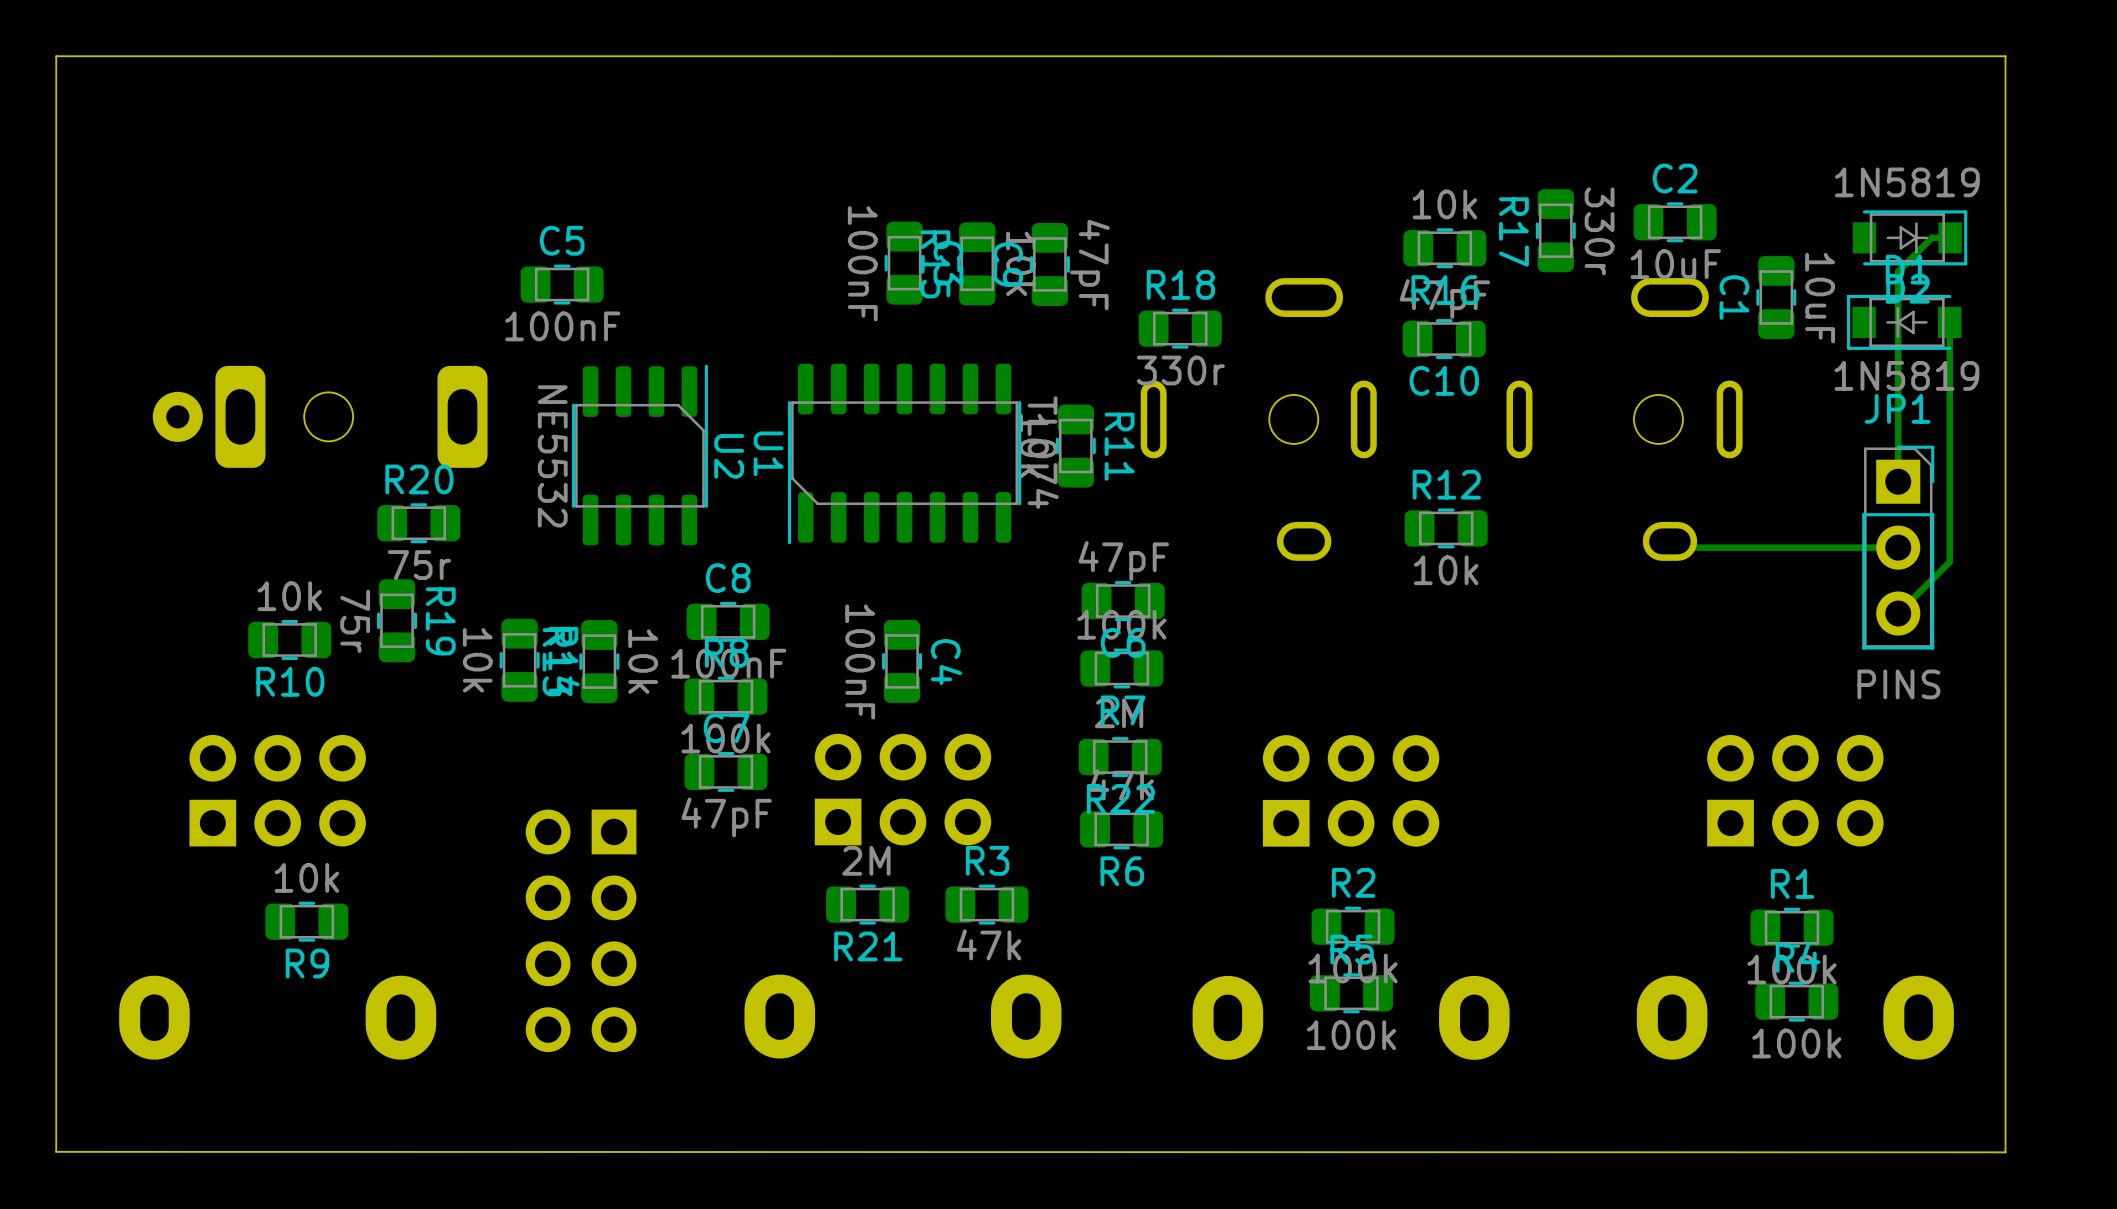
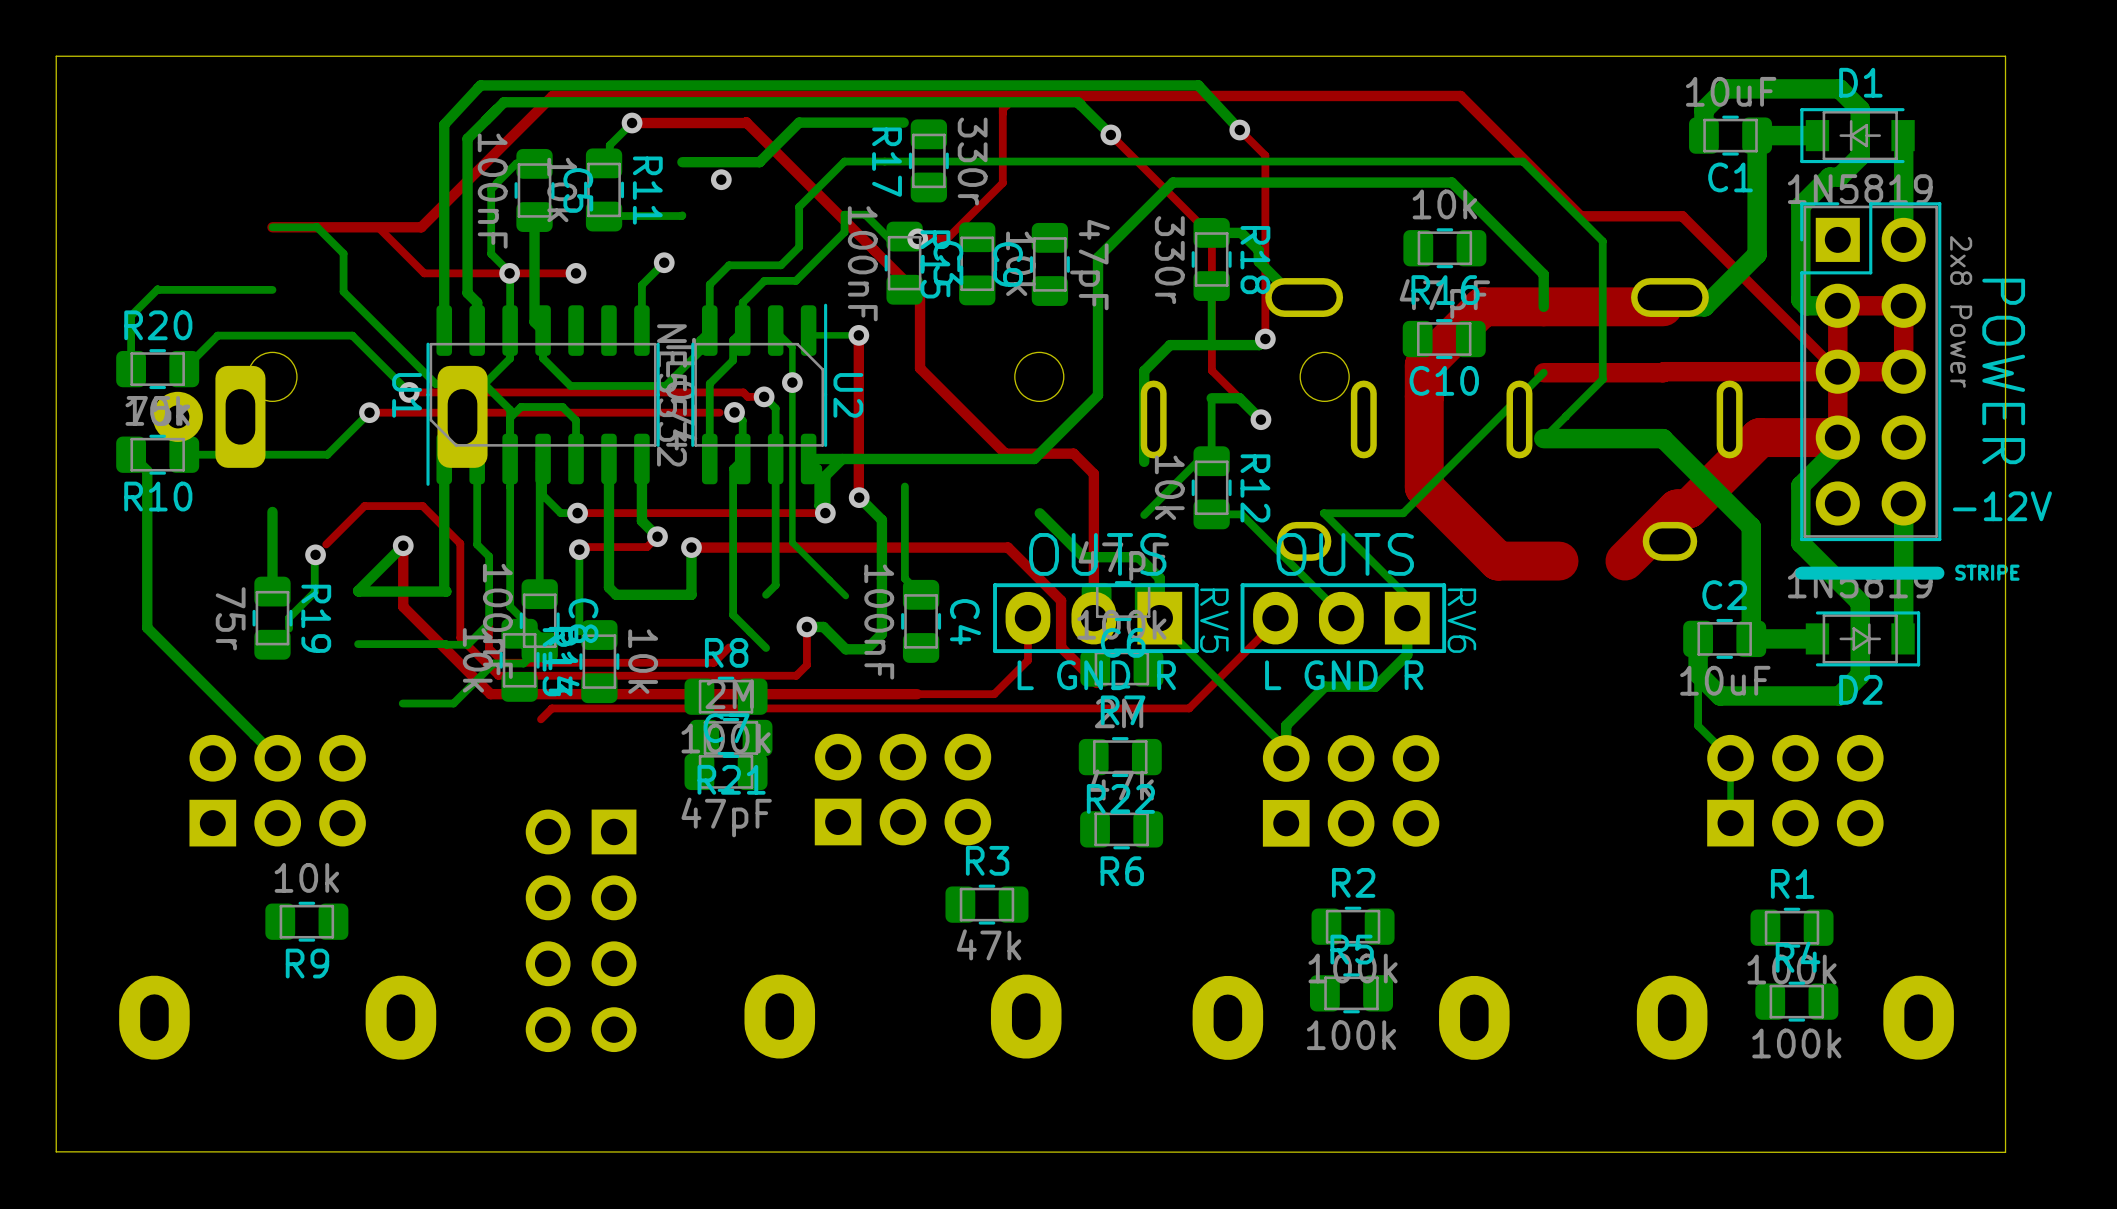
top track: none -> (1006, 95) (1002, 99) (1002, 183) (947, 238) (917, 238)
bottom track: none -> (903, 122) (799, 122) (759, 162) (682, 162)
bottom track: none -> (632, 123) (609, 145) (609, 162)
top track: none -> (632, 123) (746, 122) (920, 296) (920, 368) (1005, 453) (1073, 453) (1093, 473) (1093, 618)
via: none -> (632, 123)
bottom track: none -> (1239, 130) (1198, 85) (480, 85) (444, 124) (444, 330)
top track: none -> (1239, 130) (1265, 155) (1265, 339)
via: none -> (1239, 130)
bottom track: none -> (1110, 134) (1077, 102) (504, 102) (467, 138) (467, 293) (477, 302) (477, 330)
top track: none -> (1110, 134) (1211, 236) (1211, 370) (1260, 419)
via: none -> (1110, 134)
bottom track: none -> (1703, 135) (1703, 110) (1725, 88) (1839, 88) (1860, 109) (1860, 156) (1839, 177) (1829, 177) (1800, 205) (1800, 300) (1806, 305) (1837, 305)
bottom track: none -> (1817, 135) (1757, 135) (1757, 254) (1704, 306) (1663, 306)
bottom track: none -> (1903, 135) (1903, 239)
bottom track: none -> (537, 163) (516, 163) (491, 189) (491, 253) (510, 272) (510, 358) (484, 384)
via: none -> (721, 179)
bottom track: none -> (682, 215) (609, 216)
bottom track: none -> (534, 217) (534, 322) (543, 330) (543, 358) (570, 385) (665, 385) (700, 351) (700, 340) (709, 330) (709, 284) (729, 265) (780, 265) (799, 247) (799, 206) (844, 161) (1522, 161) (1602, 241) (1602, 379) (1565, 416)
C2 position: (1675, 222) -> (1724, 638)
bottom track: none -> (272, 227) (316, 226) (343, 253) (343, 291) (435, 384) (484, 384)
R17 position: (1555, 230) -> (928, 160)
bottom track: none -> (1211, 232) (1241, 232) (1258, 250) (1258, 261) (1288, 291) (1323, 291)
D2 position: (1910, 237) -> (1862, 638)
bottom track: (1950, 237) (1931, 237) (1898, 271) (1898, 481) -> none
bottom track: none -> (917, 238) (889, 238) (865, 214) (844, 214) (844, 232) (795, 280) (764, 280) (742, 302) (742, 330) (733, 340) (733, 360) (709, 383) (709, 458)
via: none -> (917, 238)
bottom track: none -> (664, 262) (641, 285) (641, 330)
via: none -> (664, 262)
via: none -> (509, 273)
top track: none -> (576, 273) (424, 273) (378, 227) (272, 227) (421, 227) (552, 95) (1460, 95) (1580, 216) (1682, 216) (1837, 371)
via: none -> (576, 273)
C5 rotation: 0° (562, 284) -> 90° clockwise (534, 190)
C5 position: (562, 284) -> (534, 190)
bottom track: none -> (1211, 286) (1211, 345)
bottom track: none -> (272, 289) (157, 289) (131, 315) (131, 369)
C1 name position: C1 (1734, 297) -> C1 (1730, 177)
C1 rotation: 0° (1776, 297) -> 90° clockwise (1730, 135)
C1 position: (1776, 297) -> (1730, 135)
C1 value position: 10uF (1820, 298) -> 10uF (1731, 91)
bottom track: none -> (1543, 306) (1543, 274) (1451, 182) (1173, 182) (1098, 257) (1098, 395) (1034, 458) (808, 458) (818, 468) (818, 505) (825, 513) (825, 475) (842, 458)
top track: none -> (1663, 306) (1482, 306) (1424, 365) (1424, 487) (1498, 561) (1559, 561)
D1 position: (1904, 322) -> (1857, 135)
bottom track: (1949, 322) (1949, 562) (1898, 613) -> none
R18 rotation: 0° (1180, 328) -> 90° clockwise (1211, 259)
R18 position: (1180, 328) -> (1211, 259)
bottom track: none -> (775, 330) (792, 347) (792, 542) (845, 596)
bottom track: none -> (808, 330) (813, 335) (858, 335)
top track: none -> (858, 335) (859, 497)
via: none -> (858, 335)
bottom track: none -> (1265, 339) (1259, 345) (1170, 345) (1144, 371) (1144, 461)
via: none -> (1265, 339)
round board edge: none -> [1014, 351, 1065, 403]
bottom track: none -> (184, 369) (217, 335) (352, 335) (409, 392)
bottom track: none -> (1543, 372) (1403, 513) (1323, 513) (1407, 596) (1407, 654) (1375, 686) (1324, 686) (1286, 725) (1286, 758)
top track: none -> (1543, 372) (1664, 371) (1903, 371) (1903, 305) (1837, 305) (1837, 437) (1759, 437) (1688, 508) (1677, 508) (1624, 561)
via: none -> (792, 382)
bottom track: none -> (484, 384) (510, 409) (510, 606) (539, 636) (539, 647) (523, 663) (493, 663) (453, 703) (402, 703)
part: none -> 2x8 Power (1869, 390)
top track: none -> (409, 392) (743, 392) (747, 396) (764, 396)
via: none -> (409, 392)
round board edge: [1633, 394, 1684, 445] -> none
bottom track: none -> (764, 396) (775, 408) (775, 585) (766, 594)
via: none -> (764, 396)
bottom track: none -> (369, 412) (327, 454) (184, 454)
via: none -> (369, 412)
top track: none -> (719, 412) (369, 412)
bottom track: none -> (734, 412) (742, 420) (742, 458) (733, 468) (733, 615) (766, 647)
via: none -> (734, 412)
round board edge position: (328, 416) -> (272, 376)
bottom track: none -> (1565, 416) (1543, 438) (1663, 438) (1751, 526) (1751, 638) (1817, 638)
bottom track: none -> (510, 417) (521, 406) (562, 406) (576, 420) (576, 458)
bottom track: none -> (1260, 419) (1239, 398) (1211, 398) (1211, 461) (1198, 461) (1144, 515)
via: none -> (1260, 419)
round board edge position: (1293, 419) -> (1324, 376)
bottom track: none -> (1837, 437) (1837, 448) (1800, 485) (1800, 543) (1860, 602) (1860, 675) (1839, 695) (1720, 695) (1698, 673) (1698, 638) (1698, 725) (1730, 758) (1730, 823)
R11 position: (1075, 446) -> (604, 189)
U1 position: (904, 453) -> (543, 395)
bottom track: none -> (131, 454) (147, 470) (147, 627) (277, 758)
U2 position: (639, 455) -> (759, 394)
bottom track: none -> (444, 458) (444, 589) (446, 591) (358, 591) (403, 545)
bottom track: none -> (477, 458) (477, 544) (489, 556) (489, 623) (467, 644) (358, 644)
bottom track: none -> (608, 458) (608, 587) (616, 594) (691, 594) (691, 547)
bottom track: none -> (641, 458) (641, 521) (657, 536)
bottom track: none -> (904, 486) (904, 578) (921, 594)
via: none -> (859, 497)
bottom track: none -> (860, 498) (881, 520) (881, 633) (866, 649) (845, 649) (823, 626) (806, 626)
bottom track: none -> (1903, 503) (1903, 638)
bottom track: none -> (272, 511) (272, 591)
bottom track: none -> (577, 513) (560, 513) (543, 495) (543, 458) (539, 462) (539, 594)
via: none -> (577, 513)
top track: none -> (825, 513) (577, 513)
via: none -> (825, 513)
bottom track: none -> (1039, 513) (1083, 557) (1138, 557) (1159, 578) (1159, 622) (1289, 751) (1289, 758)
bottom track: none -> (1211, 514) (1241, 514) (1341, 614) (1341, 618)
R20 position: (418, 523) -> (157, 369)
R12 rotation: 0° (1446, 528) -> 90° clockwise (1211, 487)
R12 position: (1446, 528) -> (1211, 487)
top track: none -> (657, 536) (647, 547) (582, 547) (579, 549)
via: none -> (657, 536)
bottom track: (1669, 541) (1676, 547) (1898, 547) -> none
top track: none -> (326, 544) (364, 506) (422, 506) (460, 543) (460, 637) (498, 675) (796, 675) (806, 665) (806, 626)
top track: none -> (403, 545) (403, 606) (490, 694) (994, 694) (1027, 660) (1027, 618)
via: none -> (403, 545)
top track: none -> (691, 547) (1008, 547) (1061, 600) (1061, 647) (1096, 683)
via: none -> (691, 547)
JP1: PINS (1898, 547) -> none
bottom track: none -> (579, 549) (579, 631)
via: none -> (579, 549)
bottom track: none -> (315, 554) (314, 592) (289, 617) (289, 628)
via: none -> (315, 554)
RV5: none -> (1095, 618)
top track: none -> (1275, 618) (1275, 622) (1189, 708) (551, 708) (541, 719)
RV6: none -> (1343, 618)
R19 position: (397, 620) -> (272, 618)
C8 rotation: 0° (728, 621) -> 90° clockwise (539, 620)
C8 position: (728, 621) -> (539, 620)
top track: none -> (488, 623) (488, 648) (503, 662) (713, 662) (729, 647)
via: none -> (806, 626)
R10 position: (289, 639) -> (157, 454)
C4 position: (902, 661) -> (921, 621)
R21 position: (867, 904) -> (730, 737)

